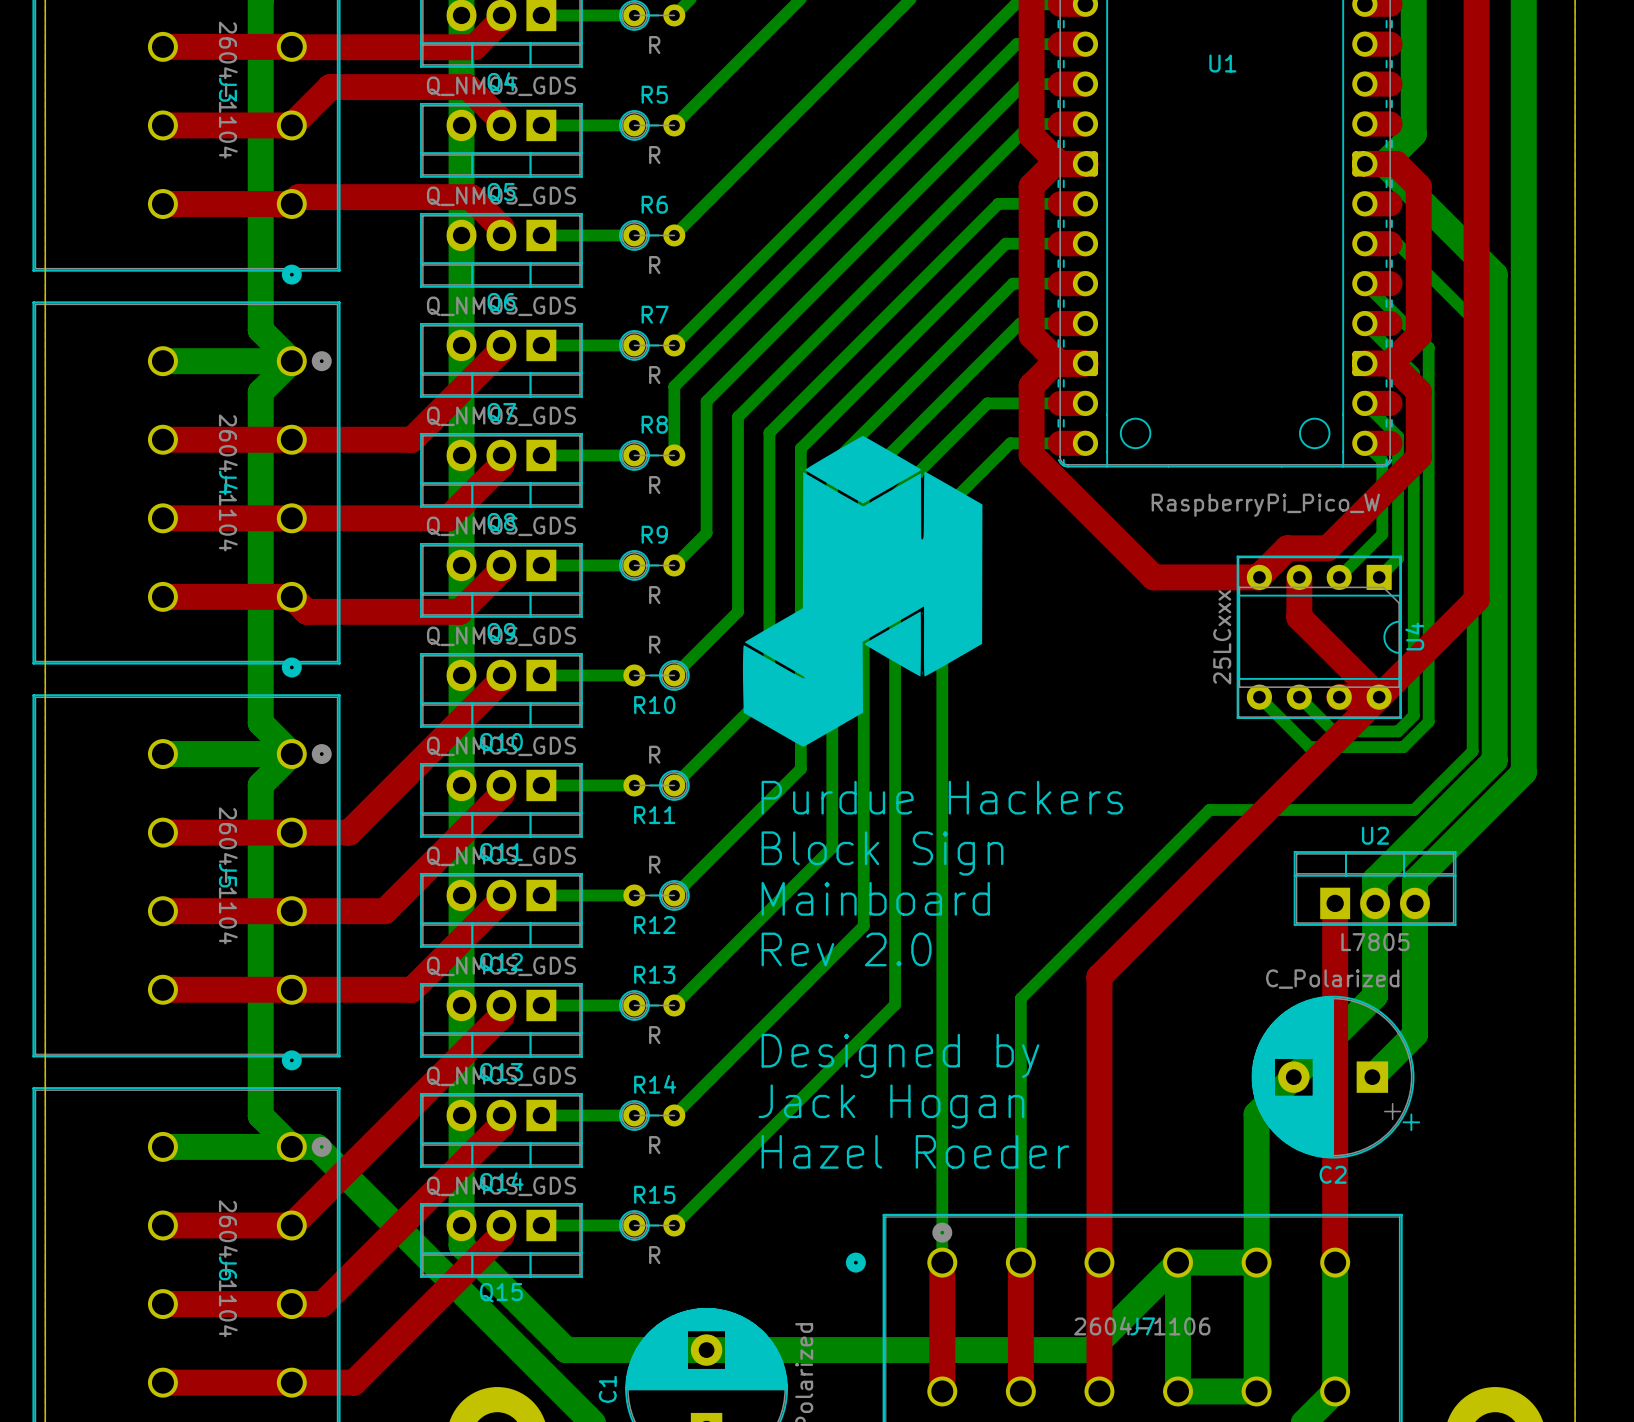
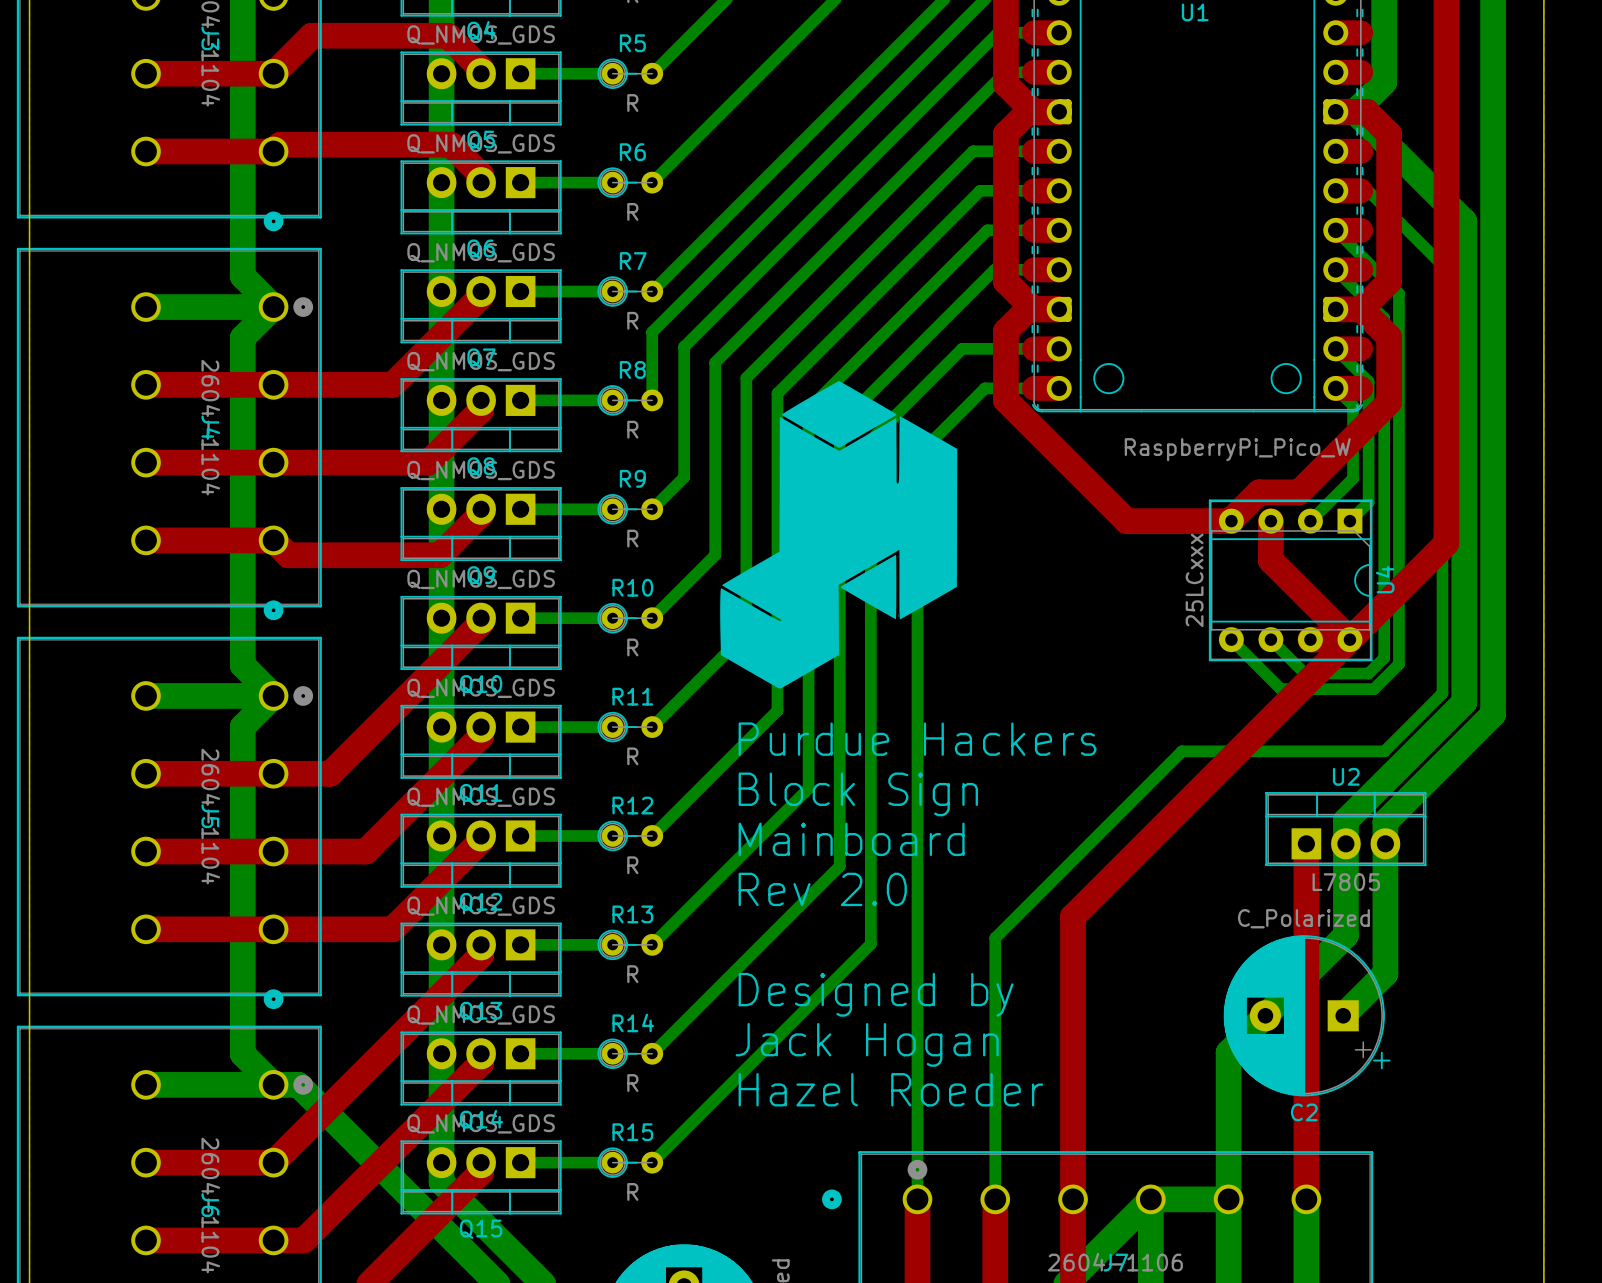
R10 rotation: 0° (656, 675) -> 180° (630, 618)
R11 rotation: 0° (656, 785) -> 180° (630, 727)
R12 rotation: 0° (656, 895) -> 180° (630, 835)

